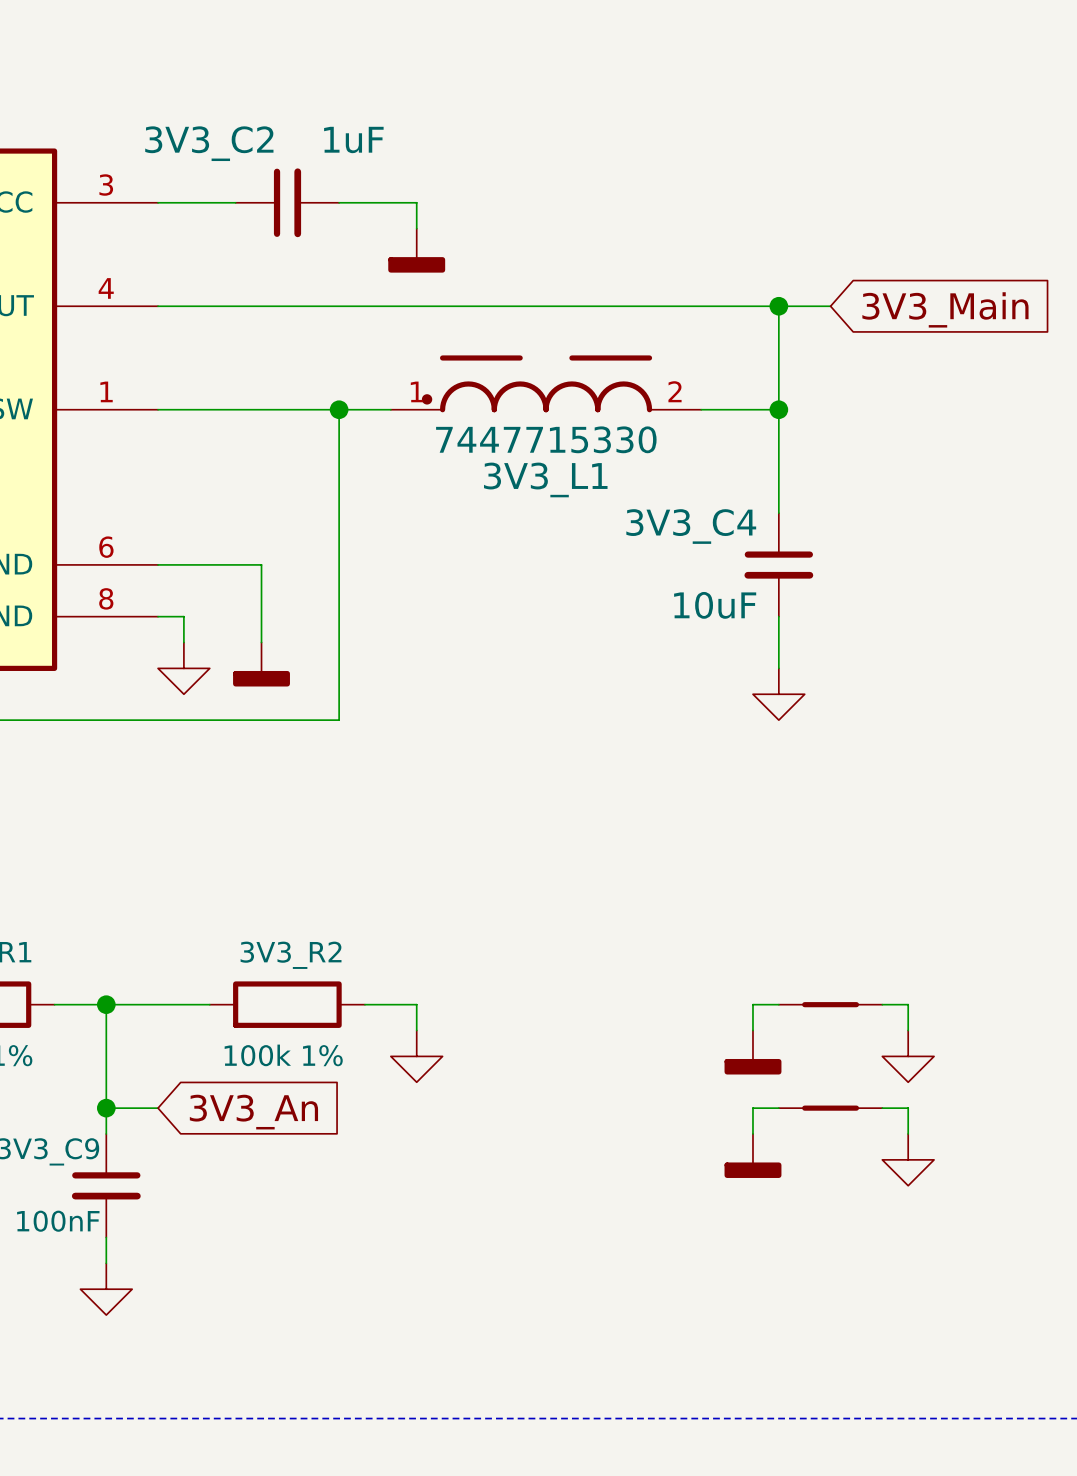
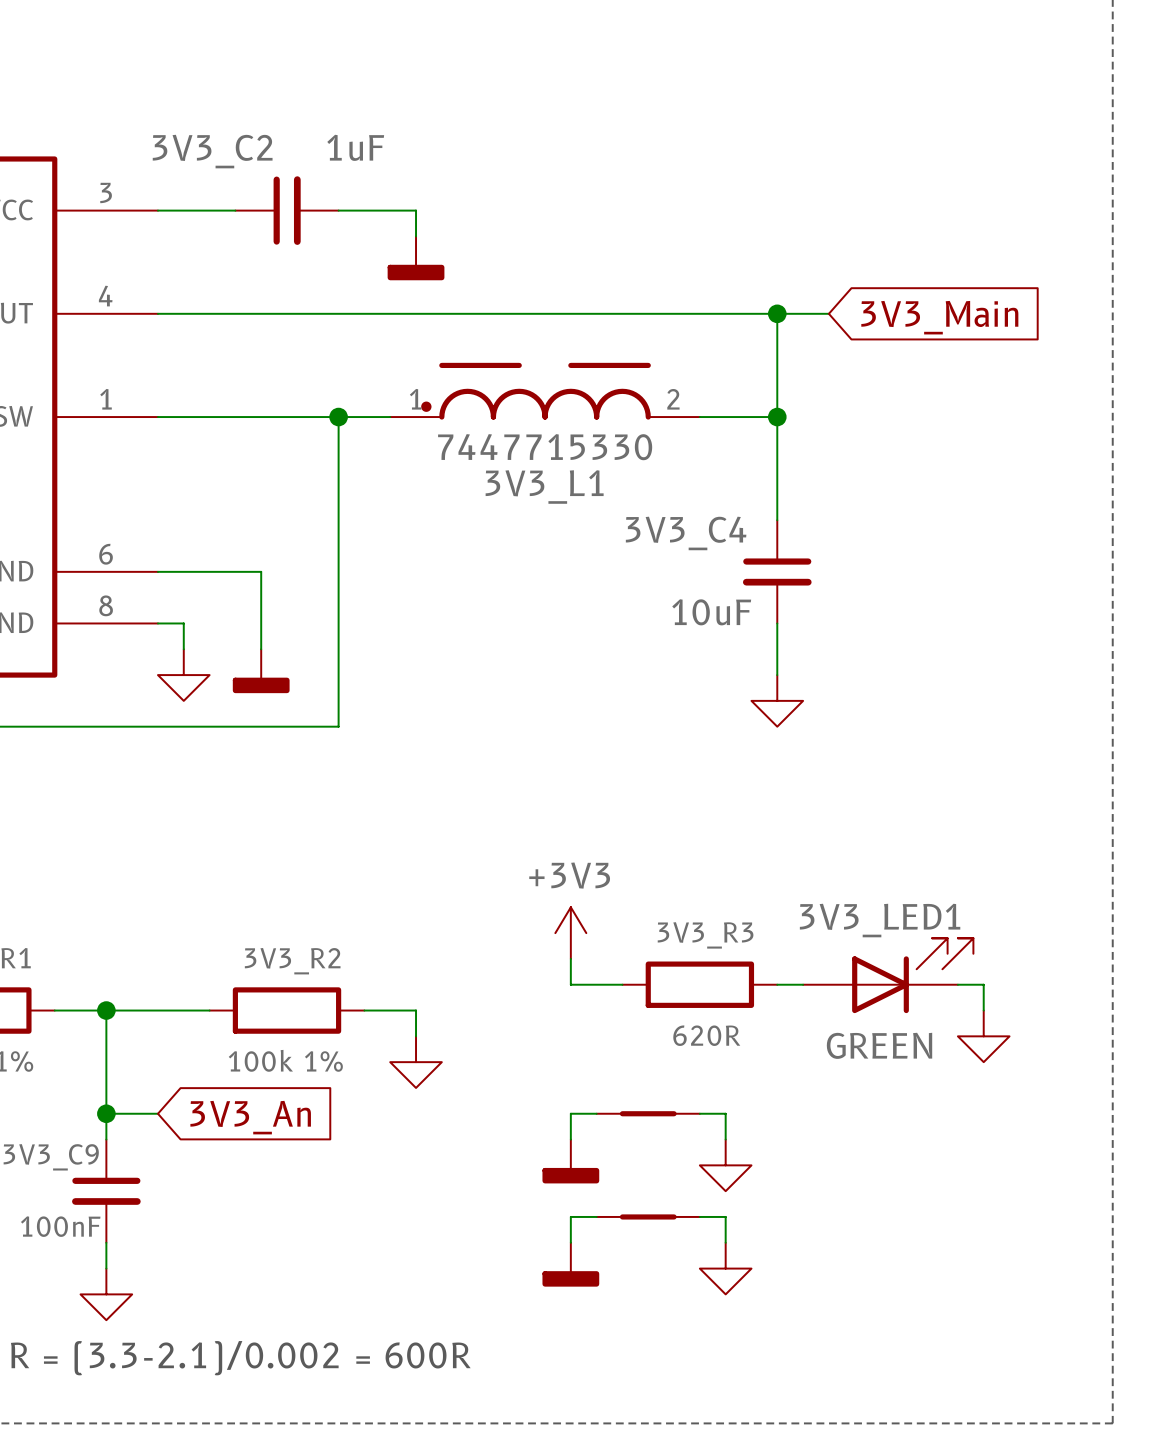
power symbol: none -> +3V3 (570, 933)
wire: none -> (570, 958) (570, 984) (622, 984)
3V3_LED1: none -> GREEN (888, 975)
3V3_R3: none -> 620R (699, 984)
wire: none -> (777, 984) (803, 984)
wire: none -> (957, 984) (983, 984) (983, 1010)
wire: (778, 1004) (752, 1004) (752, 1030) -> (596, 1113) (570, 1113) (570, 1139)
part: (830, 1004) -> none
wire: (882, 1004) (908, 1004) (908, 1030) -> (699, 1113) (725, 1113) (725, 1139)
power symbol: none -> (983, 1036)
power symbol: (752, 1052) -> none
power symbol: (908, 1056) -> none
part: none -> (648, 1113)
wire: (778, 1108) (752, 1108) (752, 1134) -> (596, 1216) (570, 1216) (570, 1242)
part: (830, 1108) -> none
wire: (882, 1108) (908, 1108) (908, 1134) -> (699, 1216) (725, 1216) (725, 1242)
power symbol: none -> (570, 1161)
power symbol: (752, 1155) -> none
power symbol: none -> (725, 1165)
power symbol: (908, 1159) -> none
part: none -> (648, 1216)
power symbol: none -> (570, 1264)
power symbol: none -> (725, 1268)
text: none -> R = (3.3-2.1)/0.002 = 600R (240, 1358)

